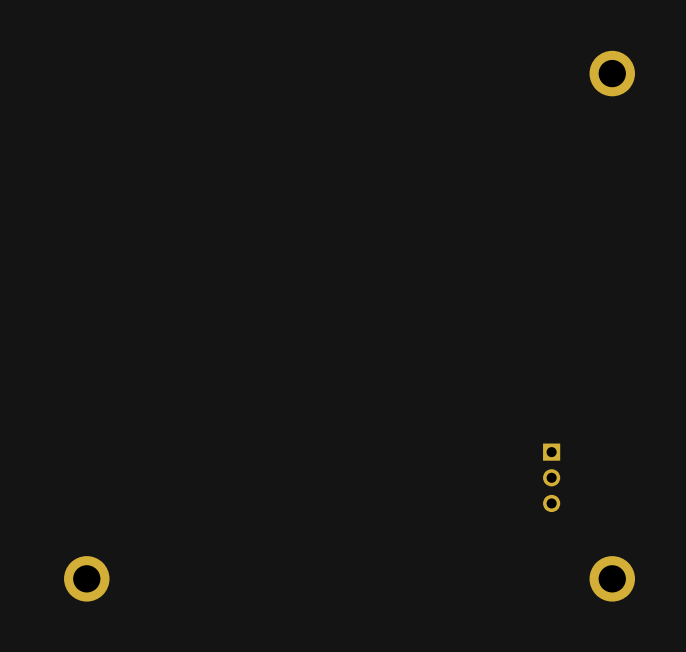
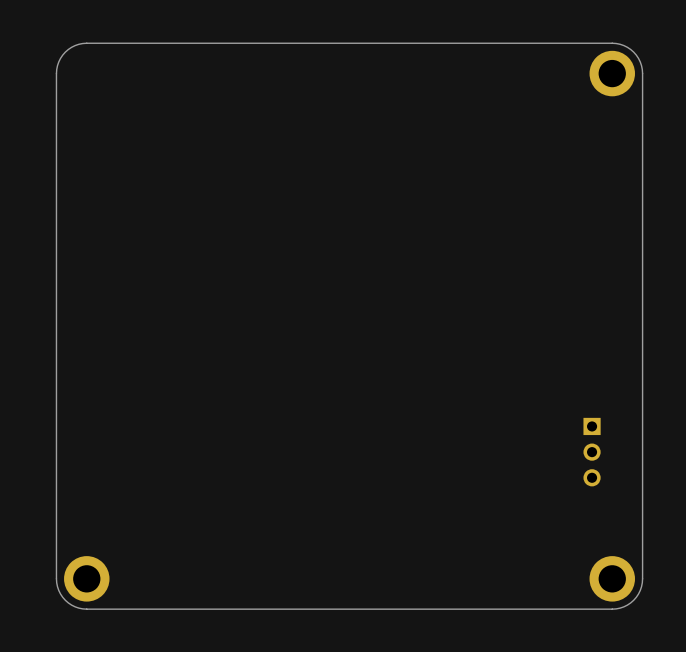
board edge: none -> (612, 43) (86, 43) (75, 45) (65, 52) (58, 61) (56, 73) (56, 578) (58, 590) (65, 600) (75, 606) (86, 609) (612, 609) (623, 606) (633, 600) (640, 590) (642, 578) (642, 73) (640, 61) (633, 52) (623, 45) (612, 43)
part position: (551, 477) -> (592, 452)

